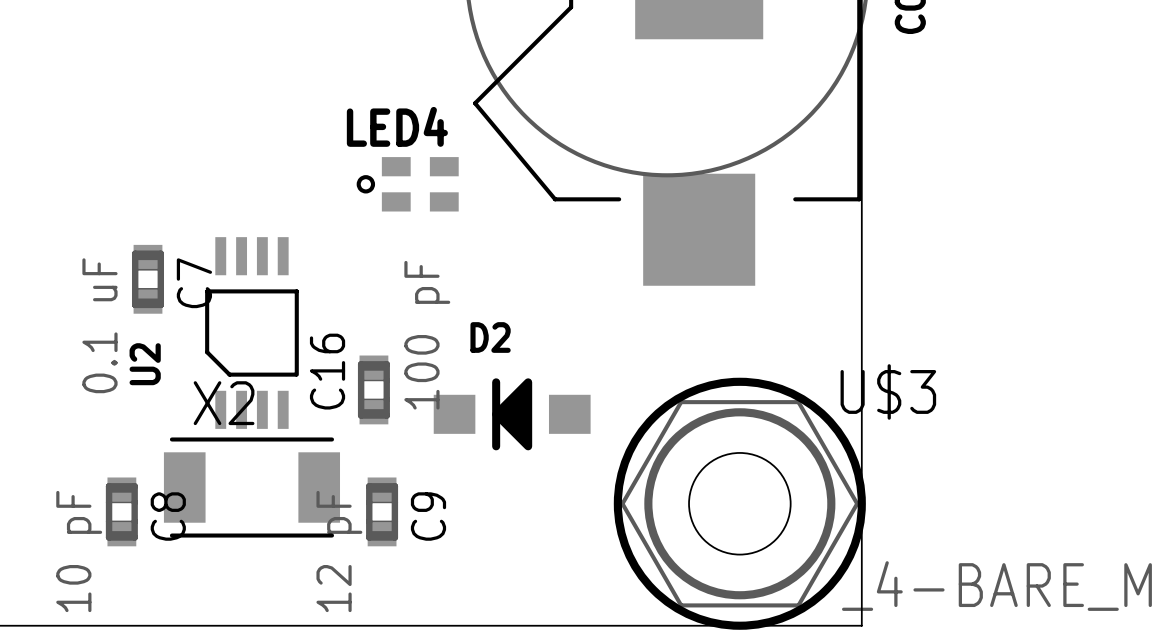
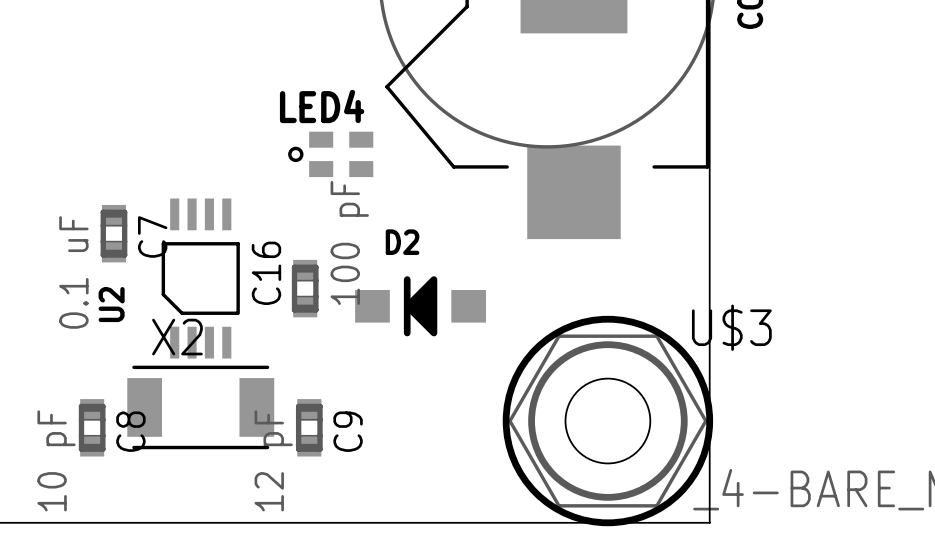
C16 position: (373, 389) -> (305, 288)
D2 position: (512, 414) -> (420, 306)

